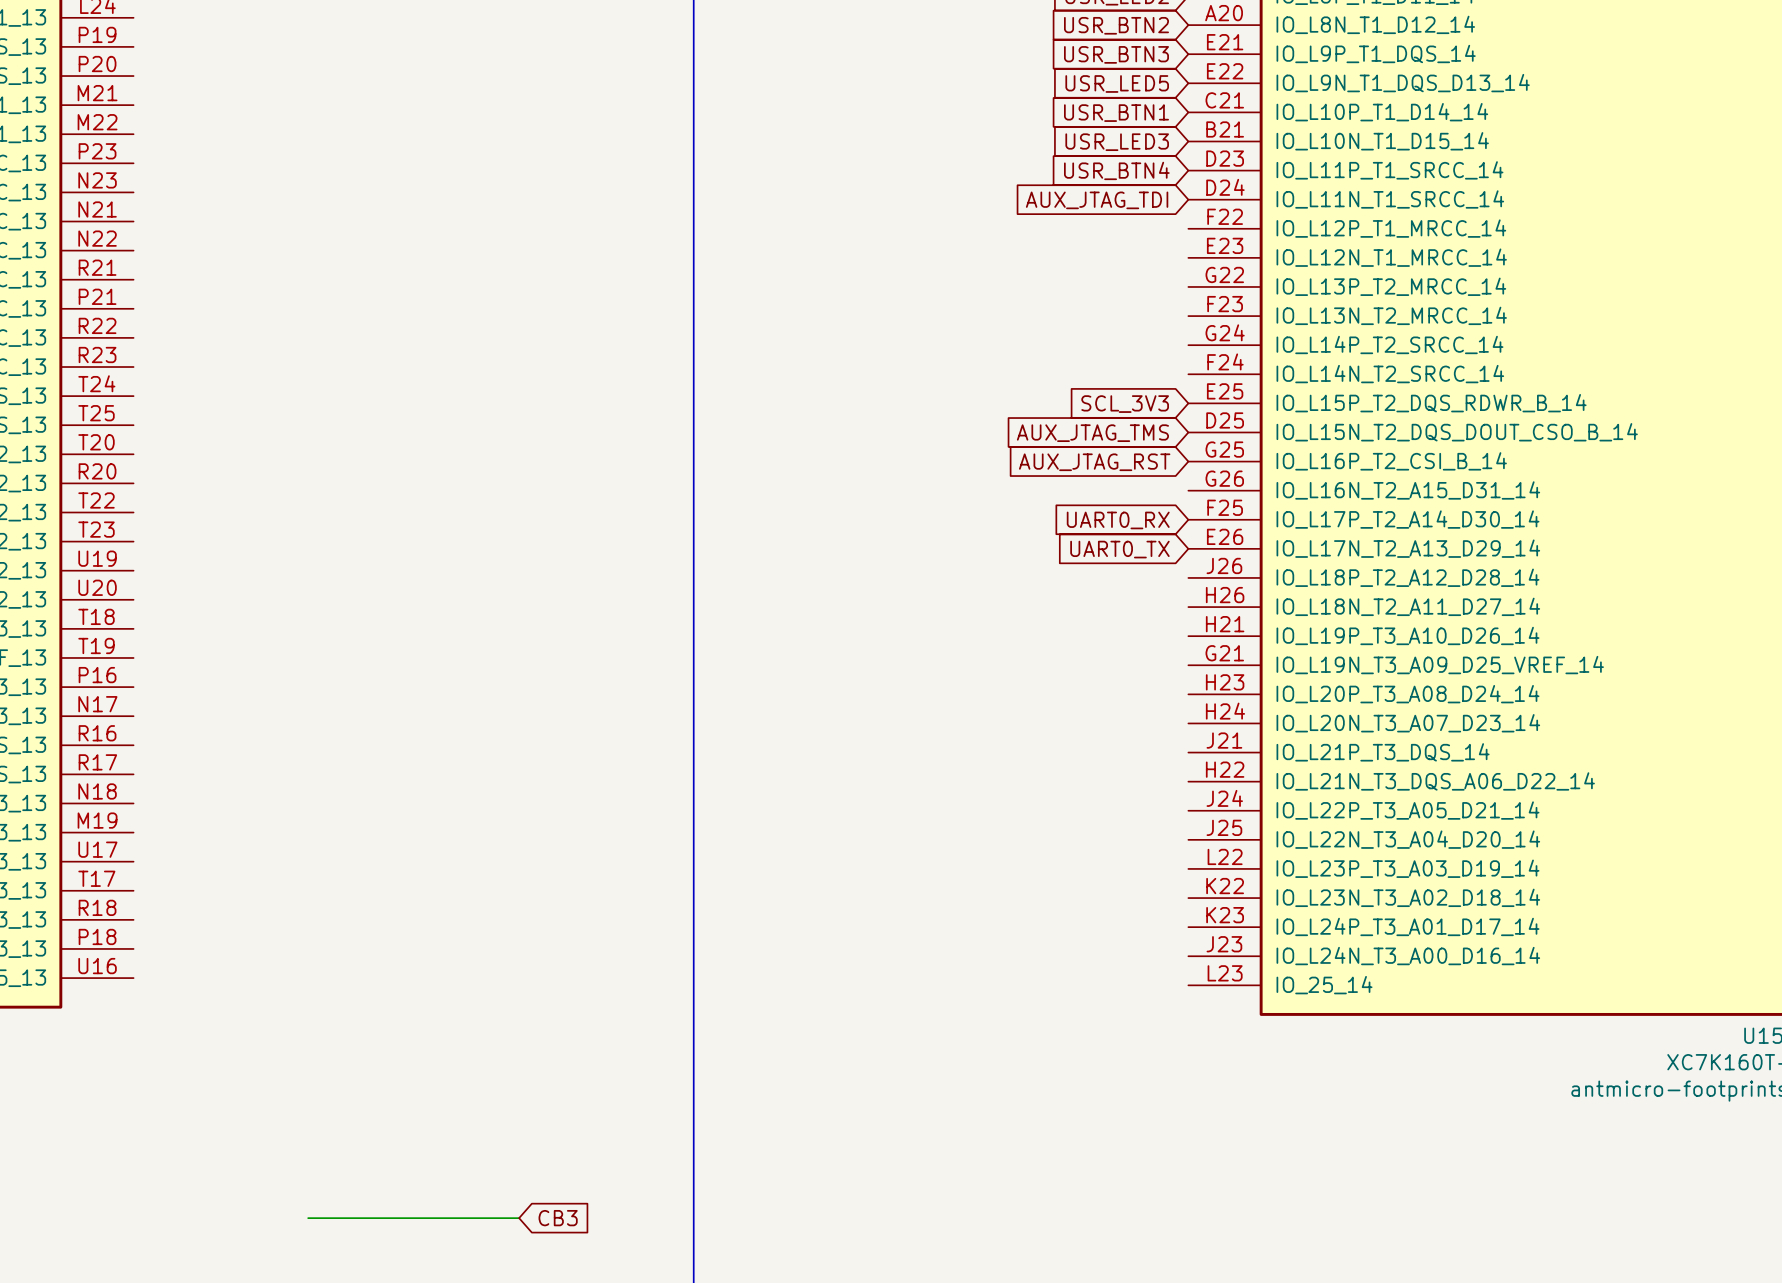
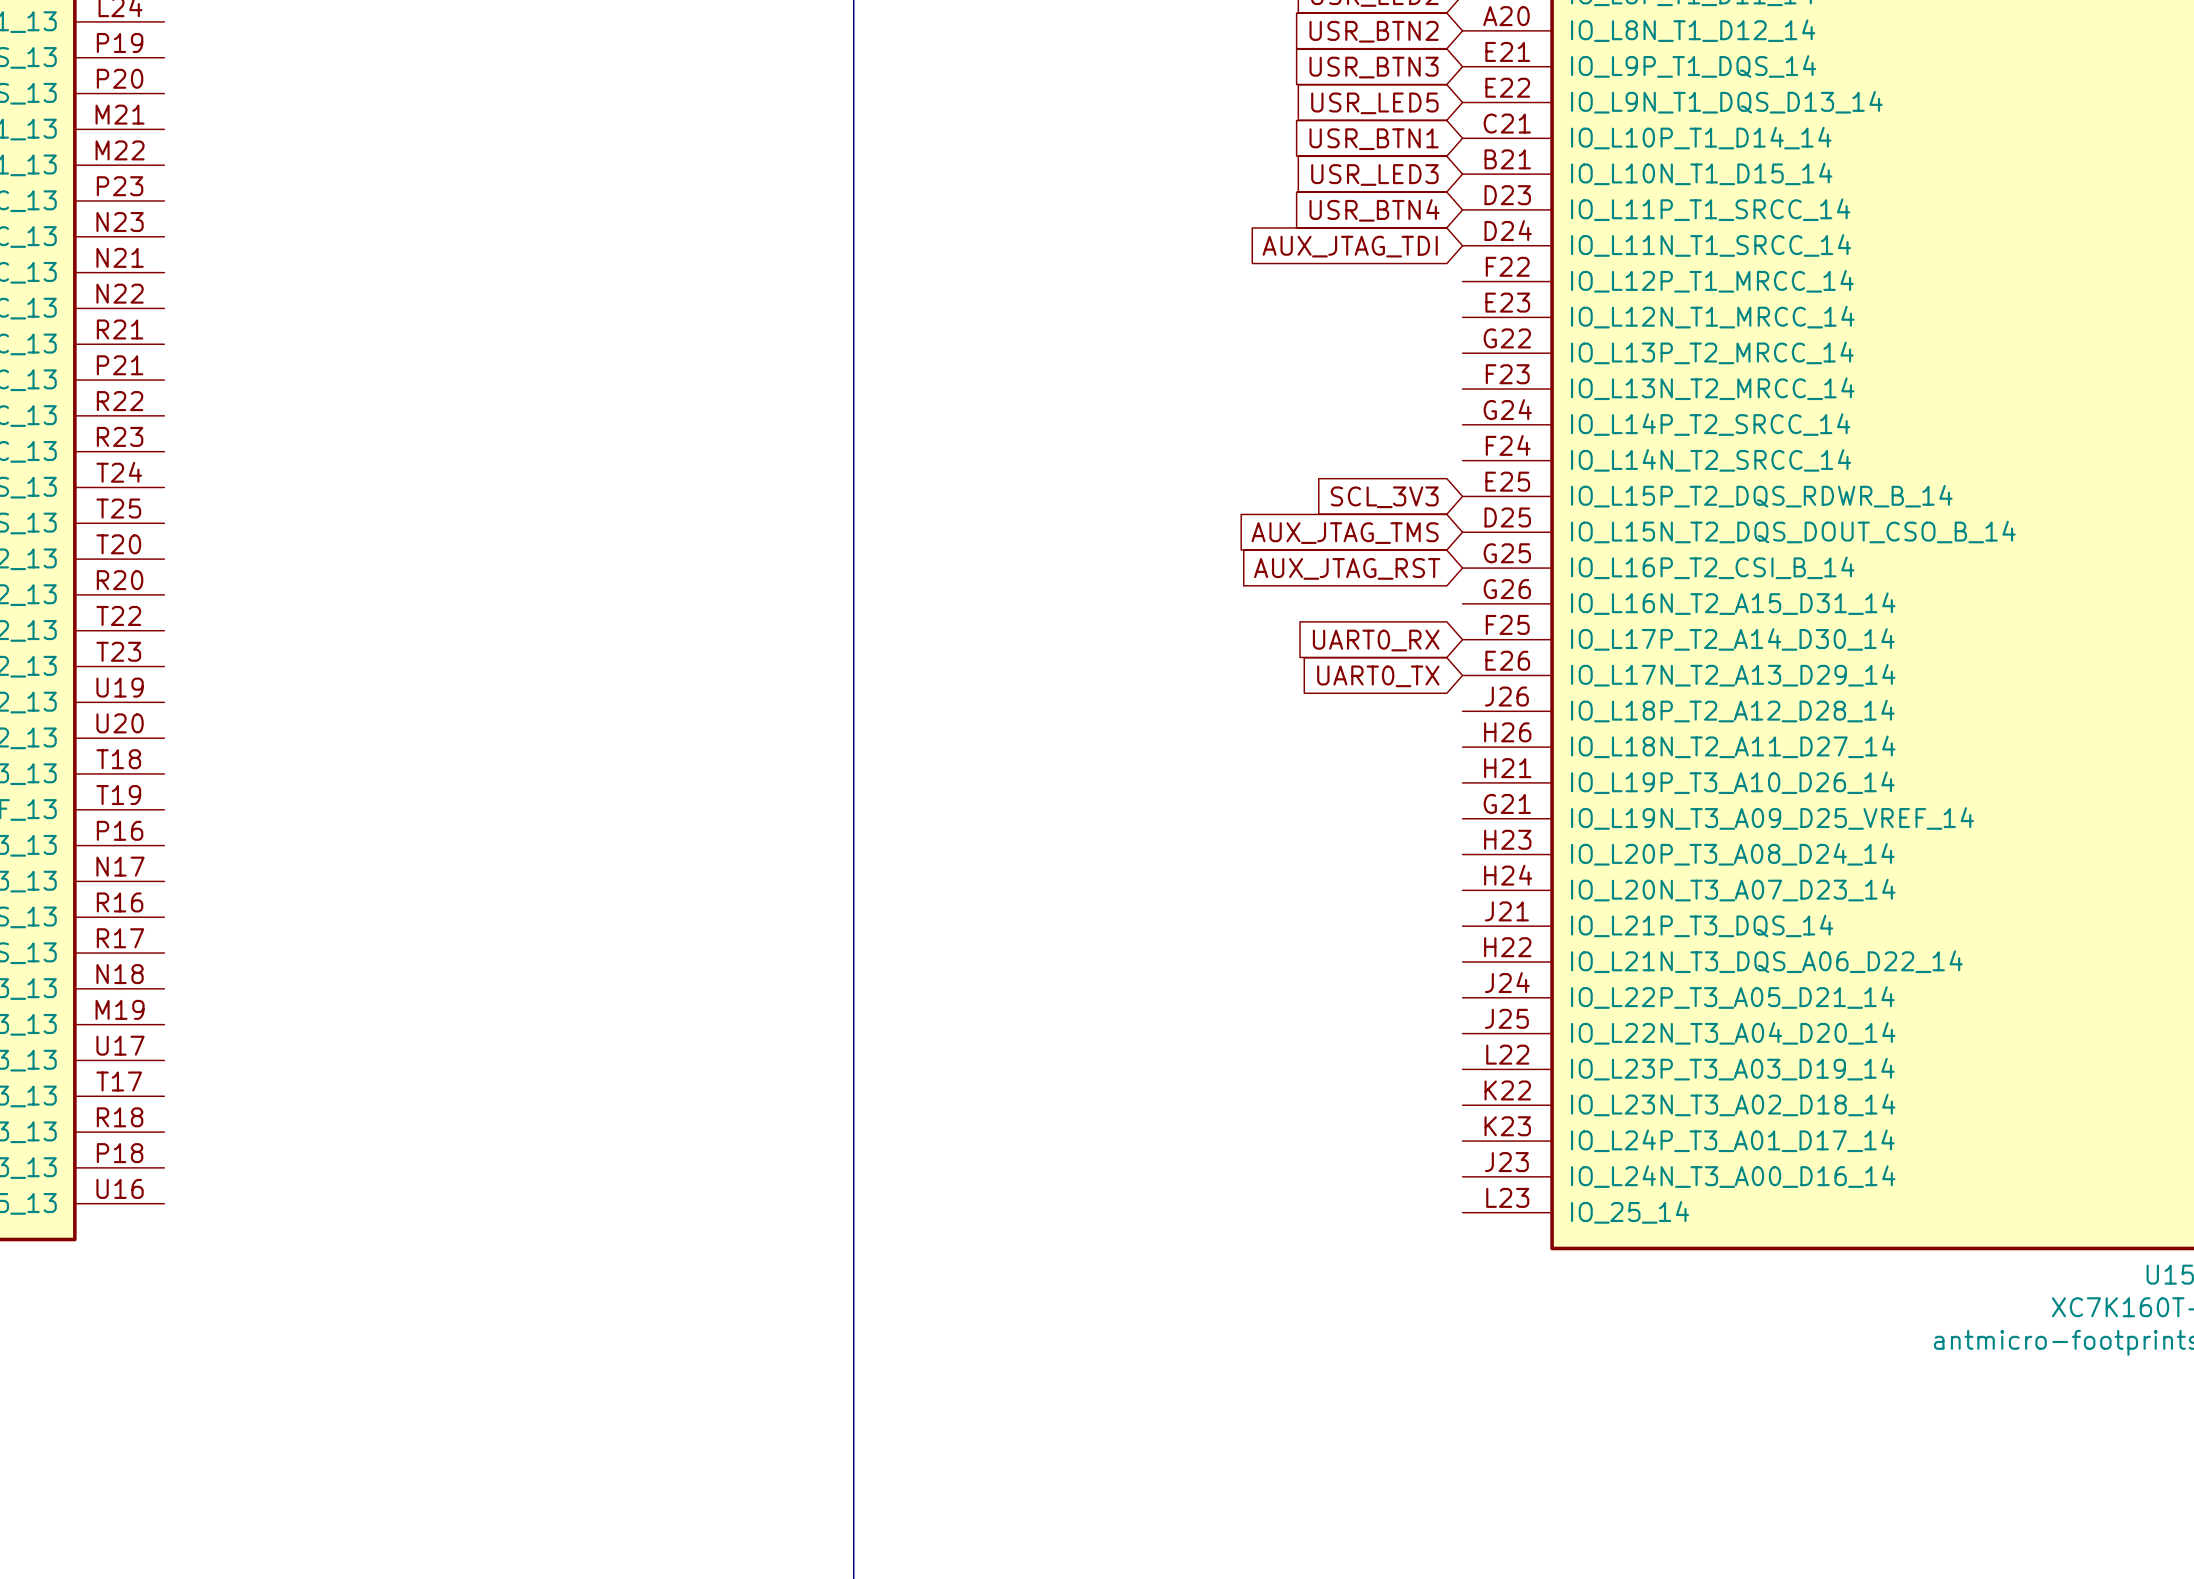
wire: (308, 1218) (519, 1218) -> none
global label: CB3 (558, 1218) -> none

